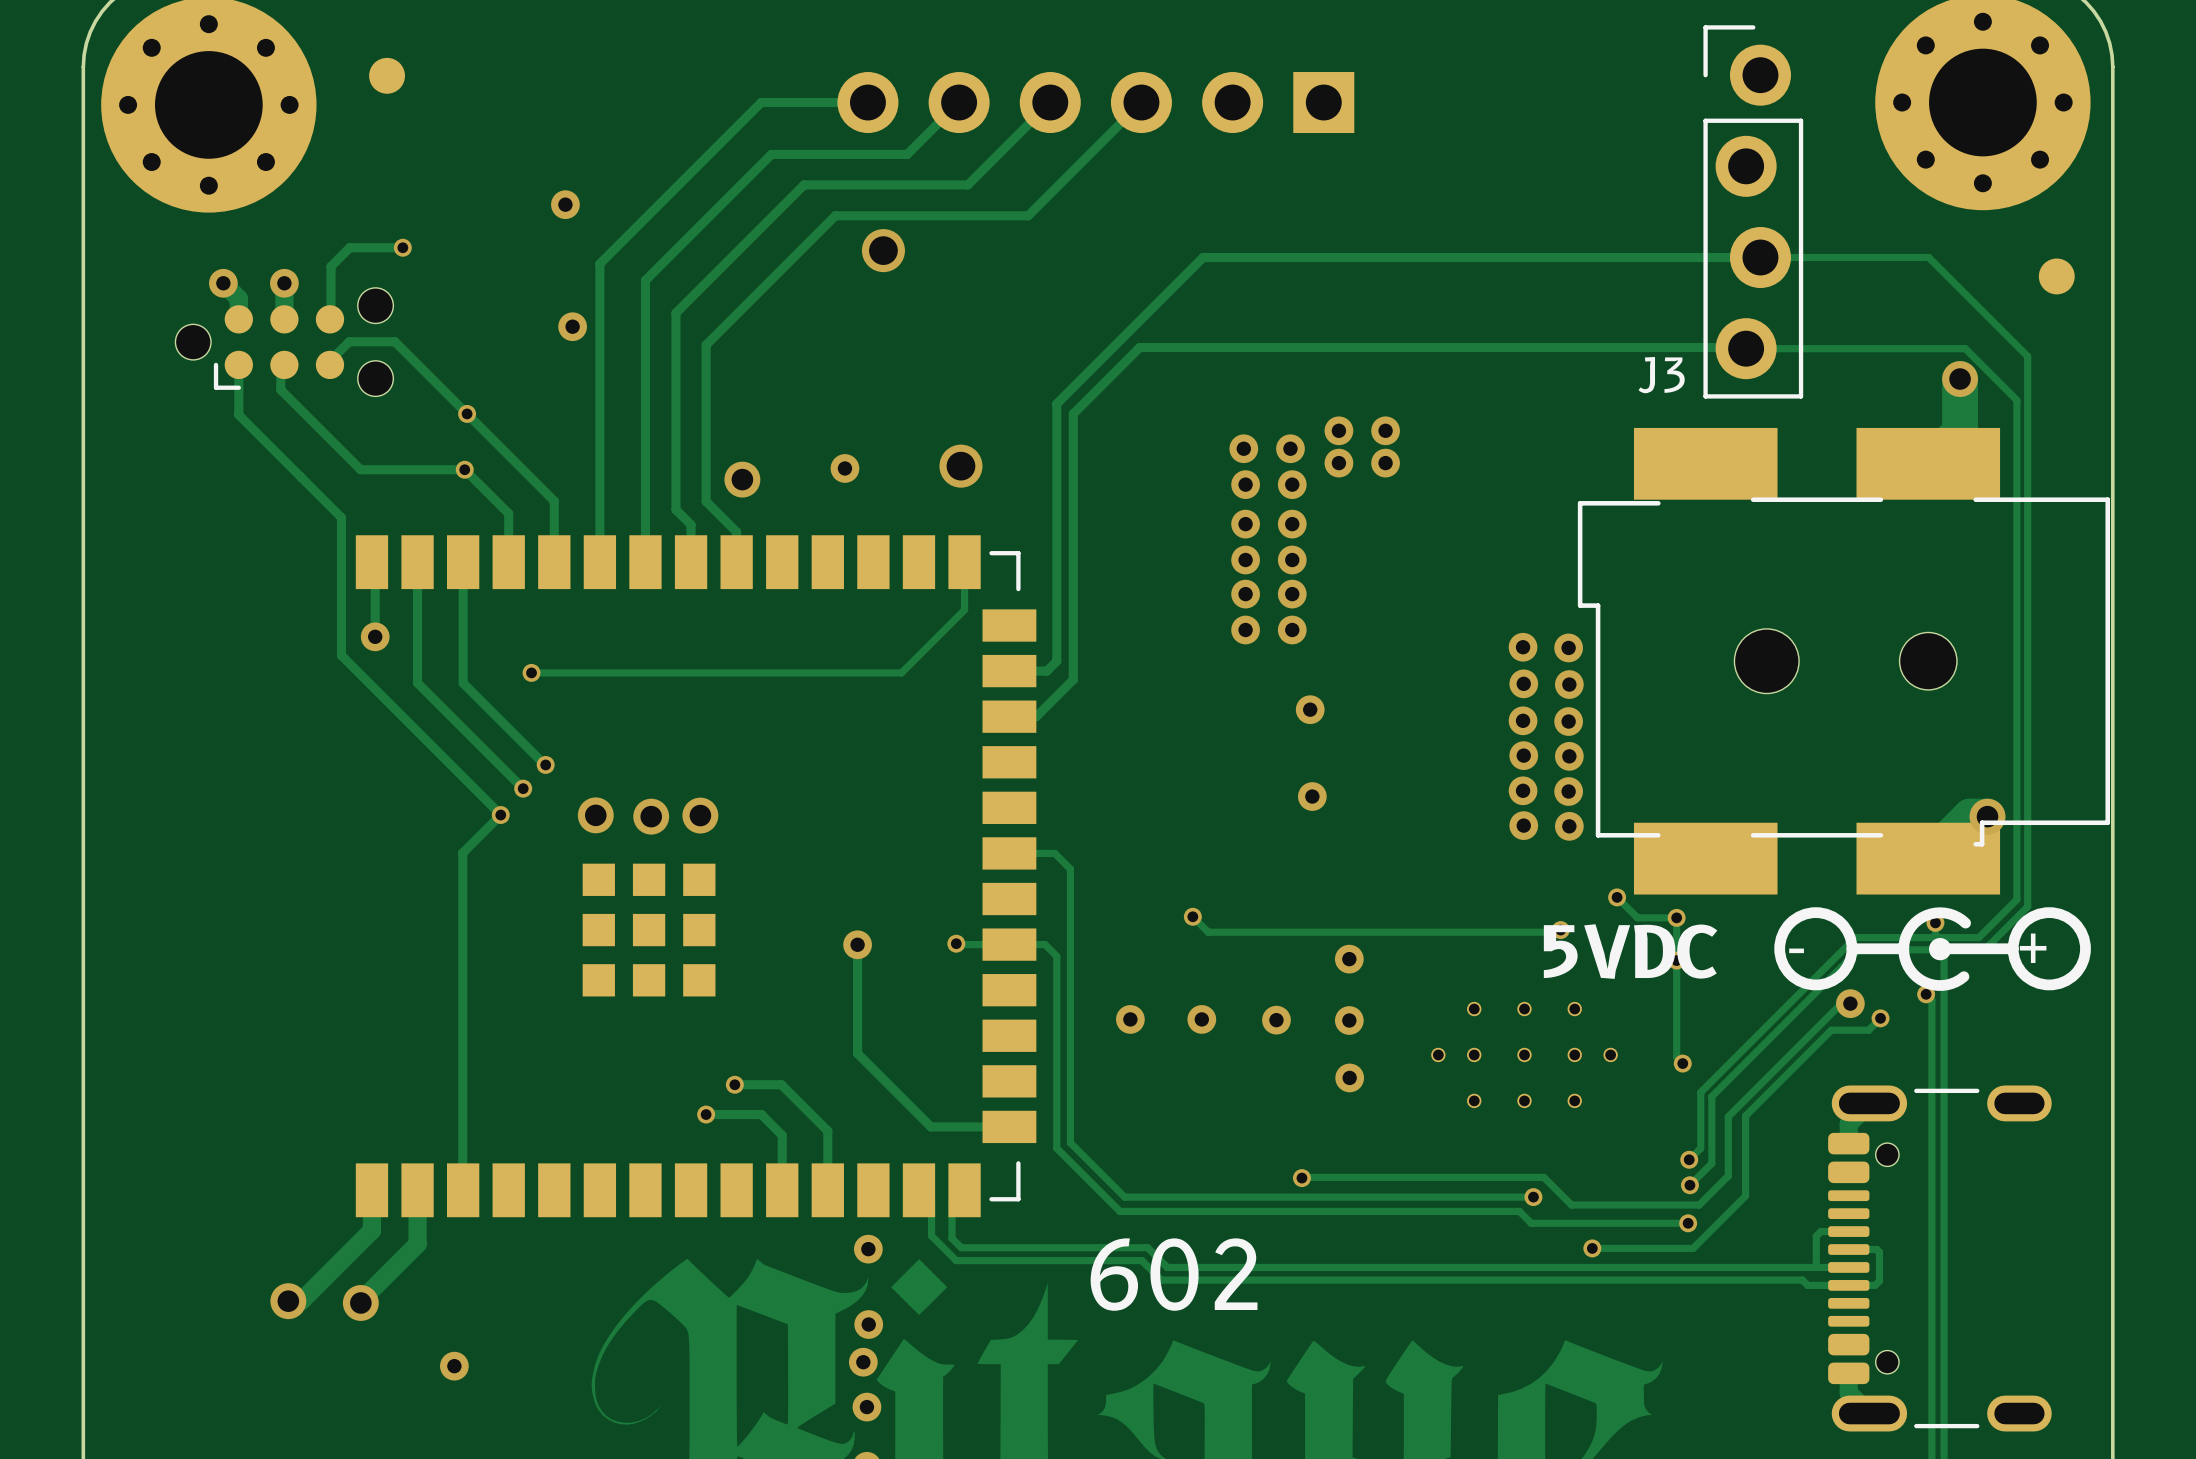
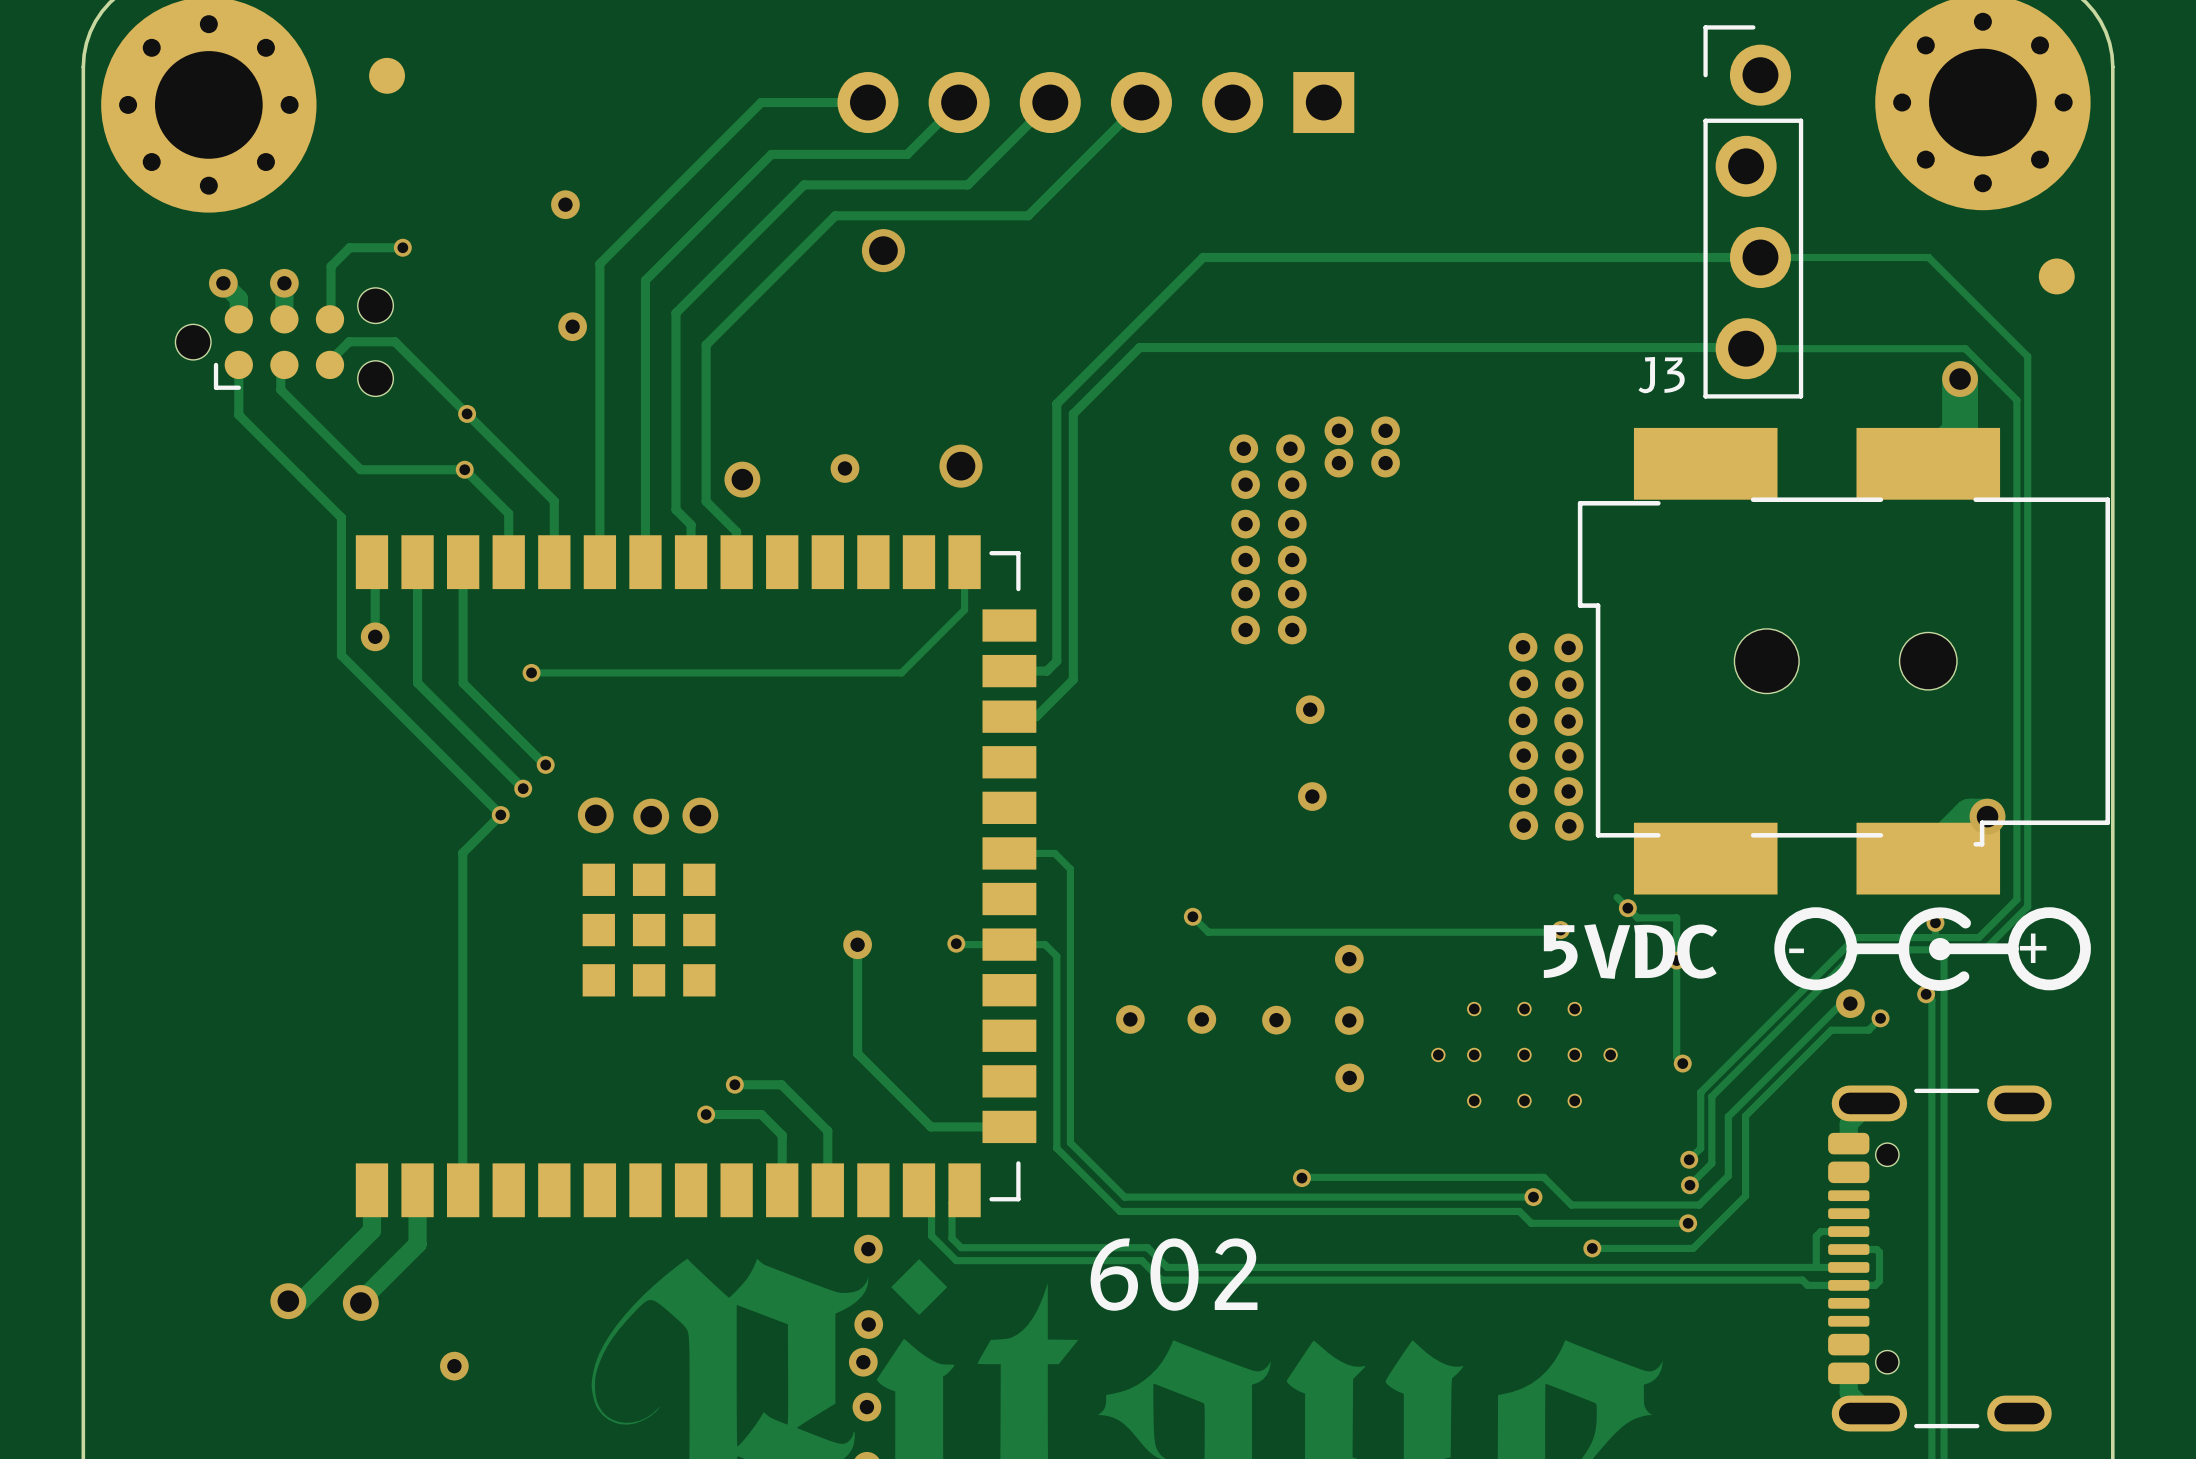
via position: (1617, 897) -> (1627, 908)
via: (1676, 917) -> none

